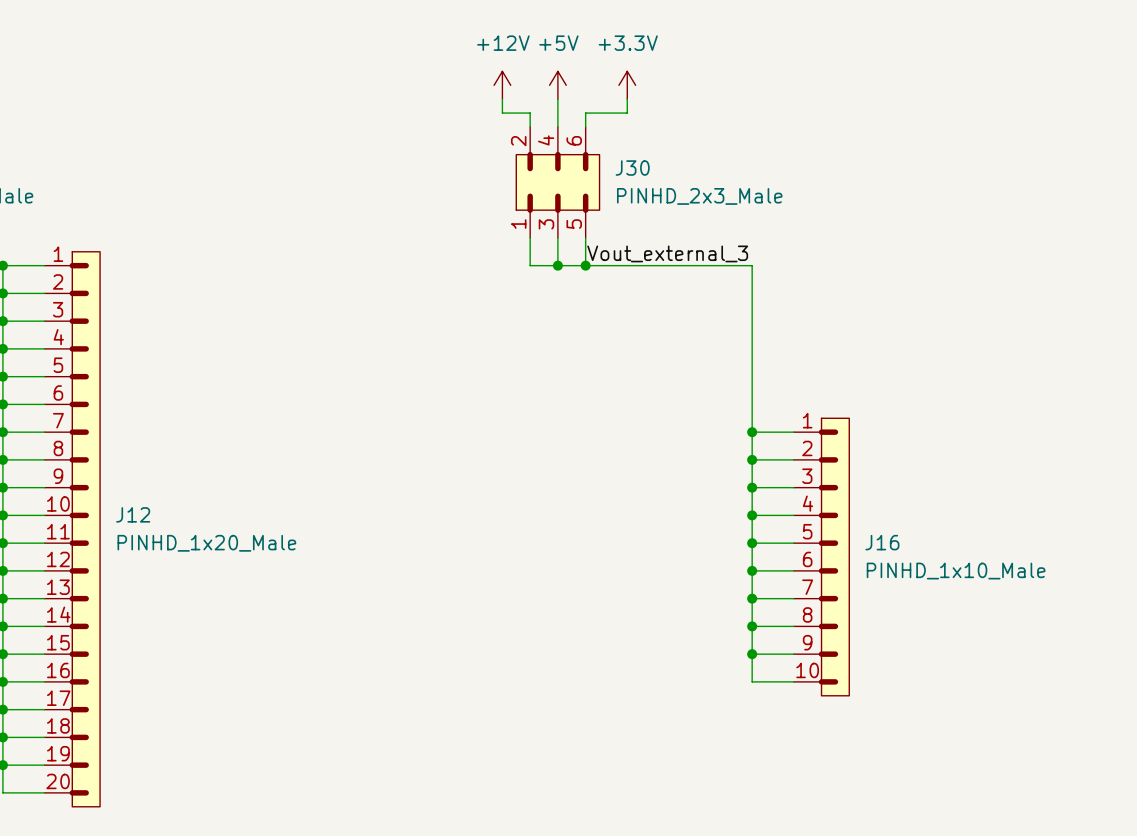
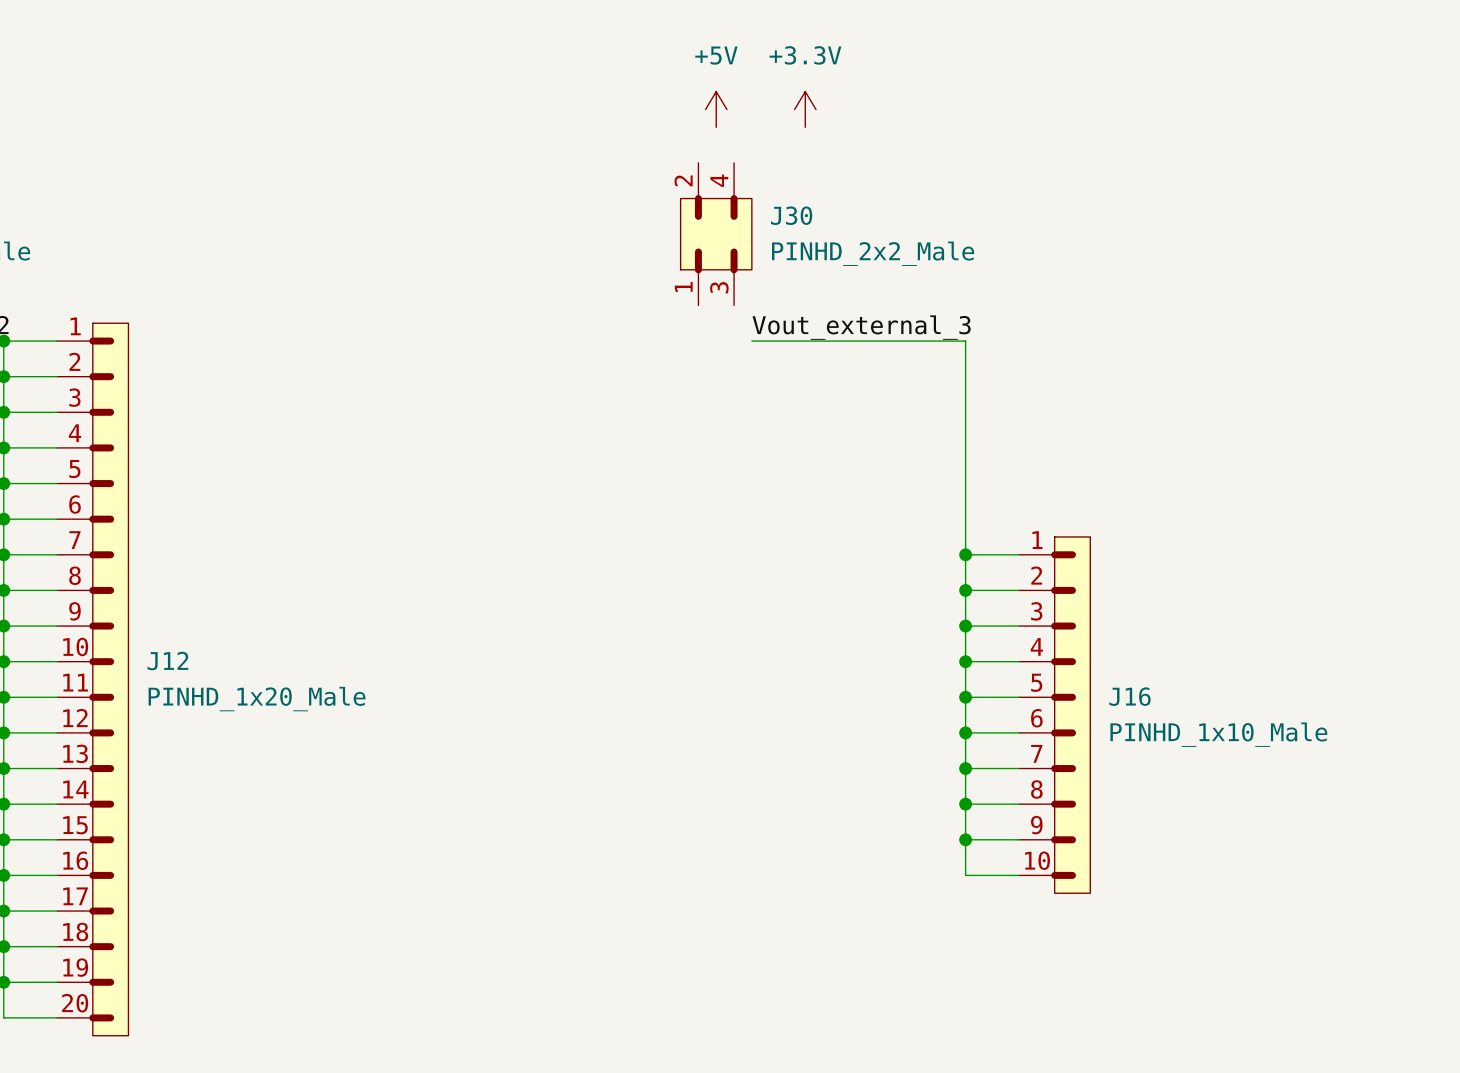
power symbol: +12V (502, 85) -> none
wire: (502, 99) (502, 113) (530, 113) (530, 126) -> none
wire: (557, 99) (557, 126) -> none
wire: (627, 99) (627, 113) (585, 113) (585, 126) -> none
J30 symbol: [516, 126, 600, 238] -> [680, 162, 752, 306]
J30 value: PINHD_2x3_Male (699, 196) -> PINHD_2x2_Male (873, 253)
wire: (530, 237) (530, 265) (585, 265) (585, 237) -> none
wire: (557, 237) (557, 265) -> none
junction: (557, 265) -> none
junction: (585, 265) -> none

